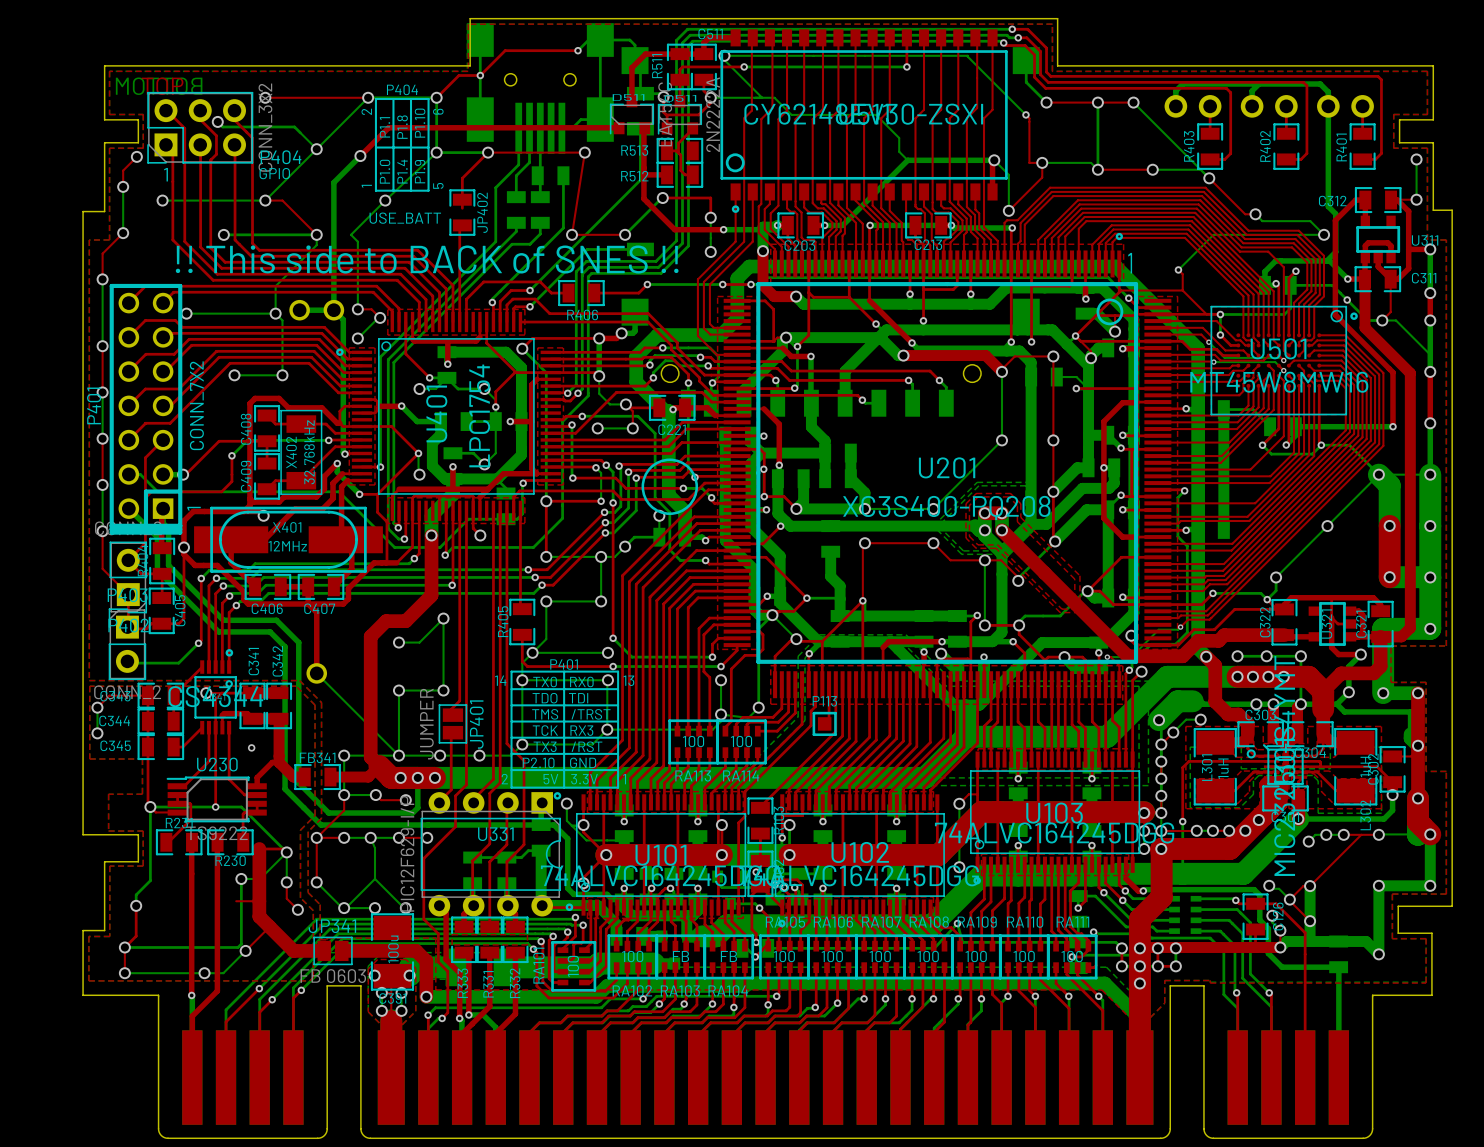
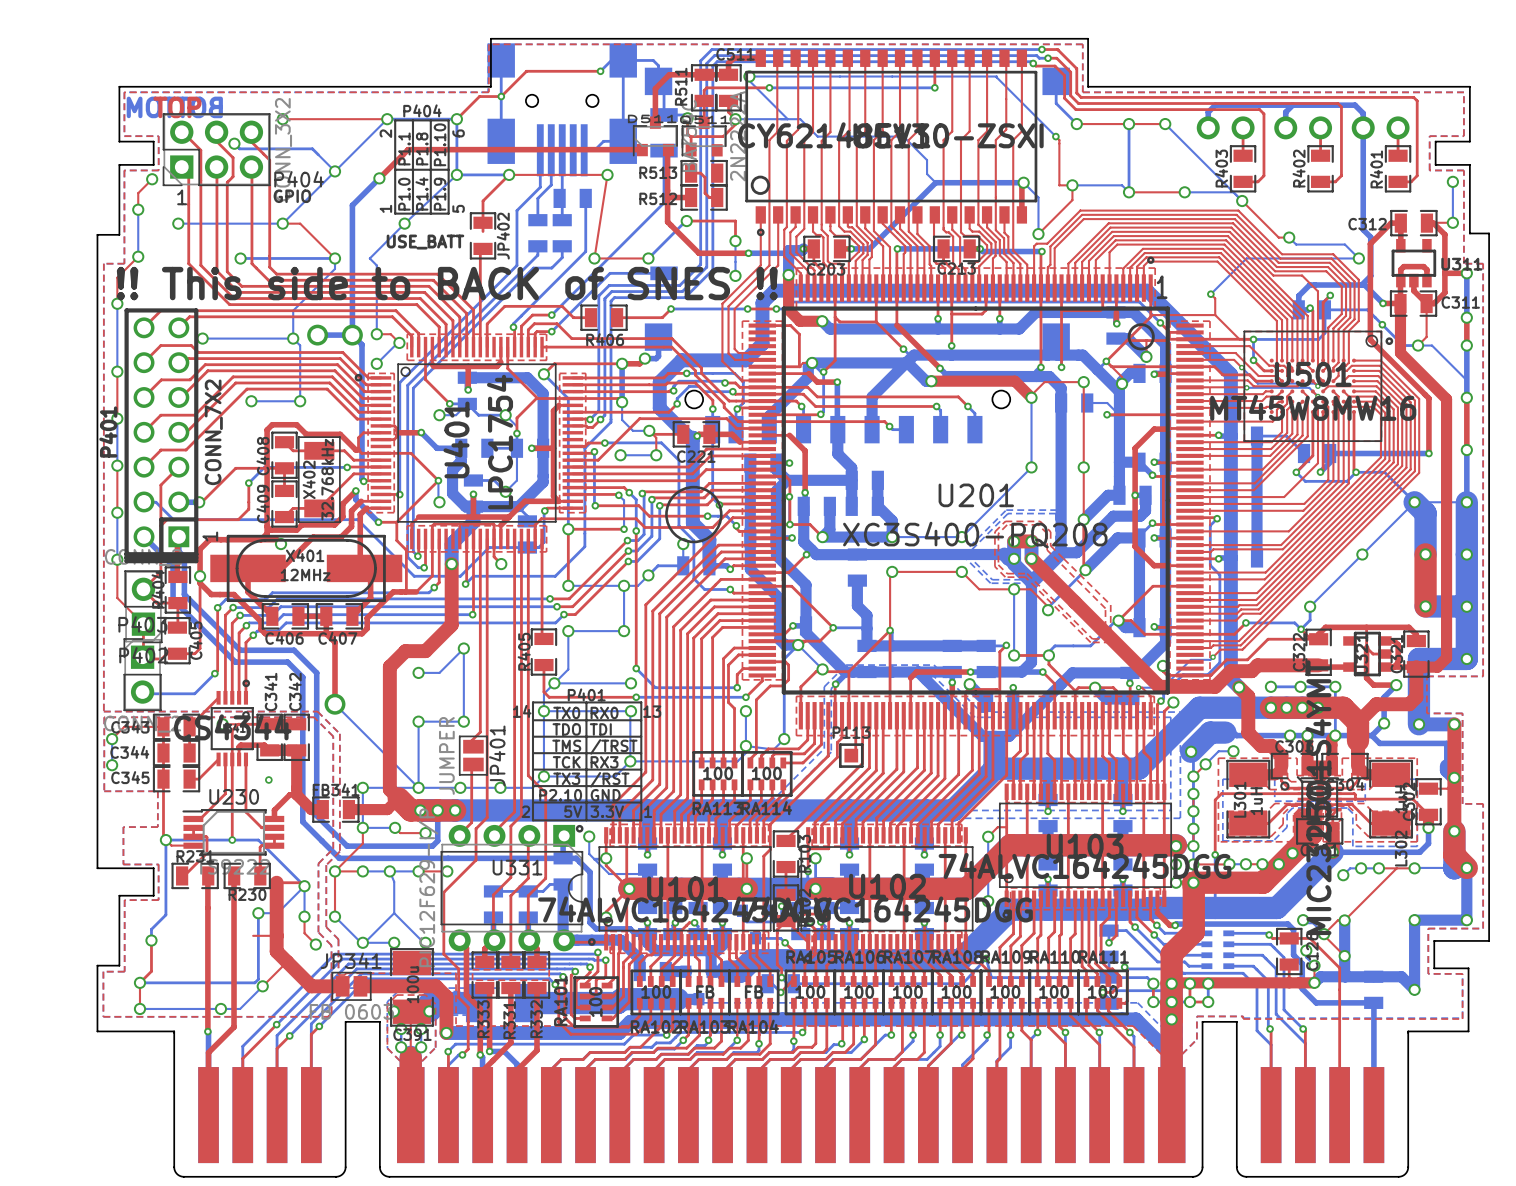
top track: (692, 128) (678, 143) (678, 152) -> none

